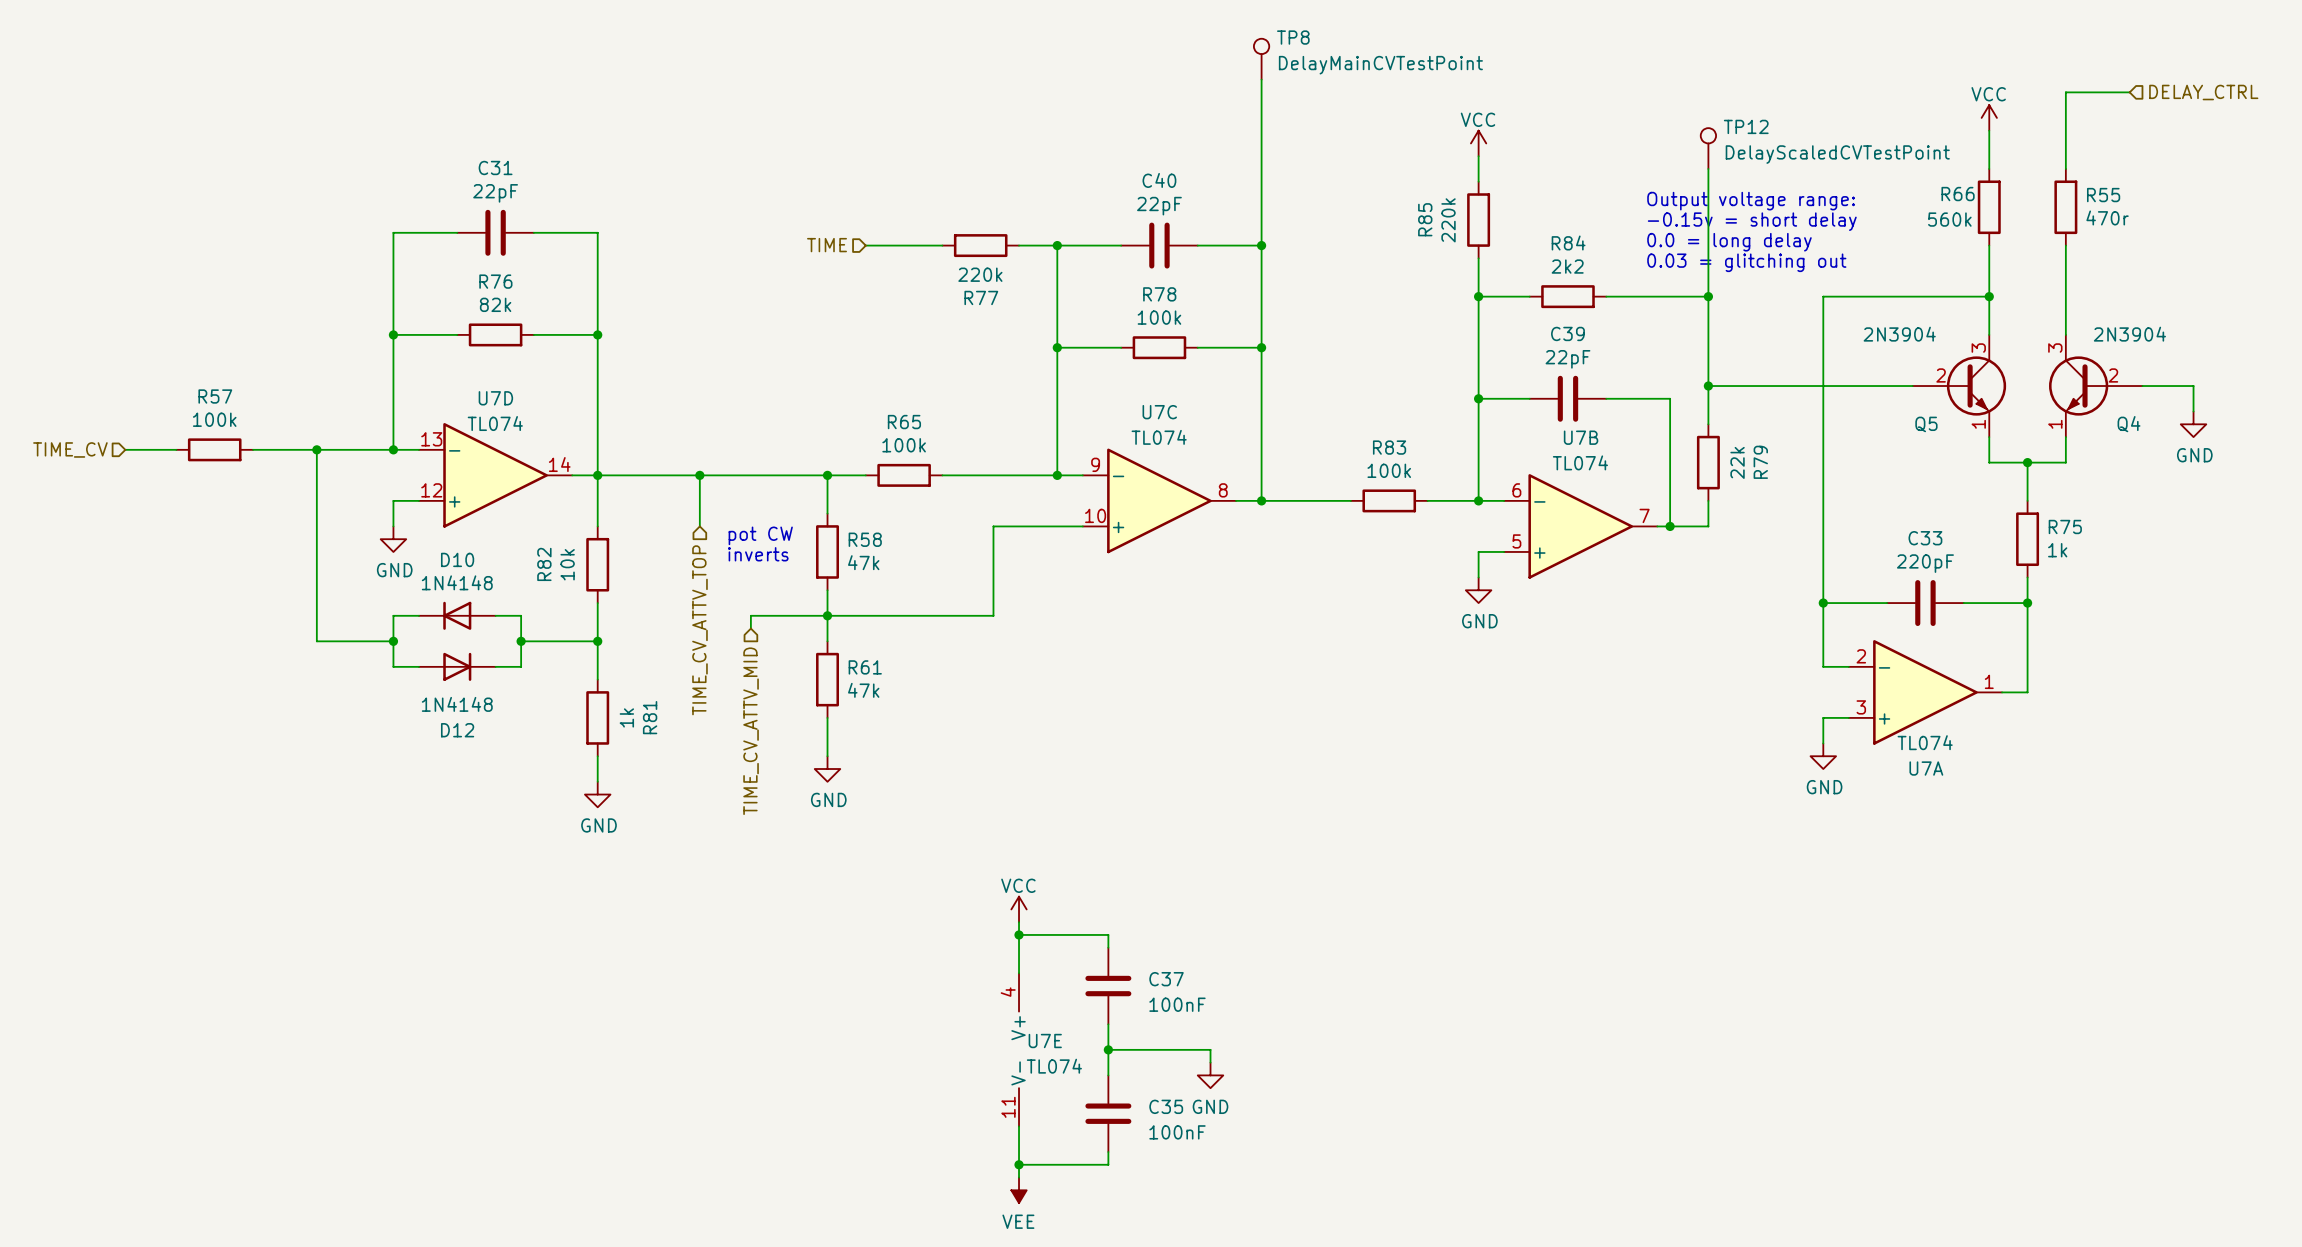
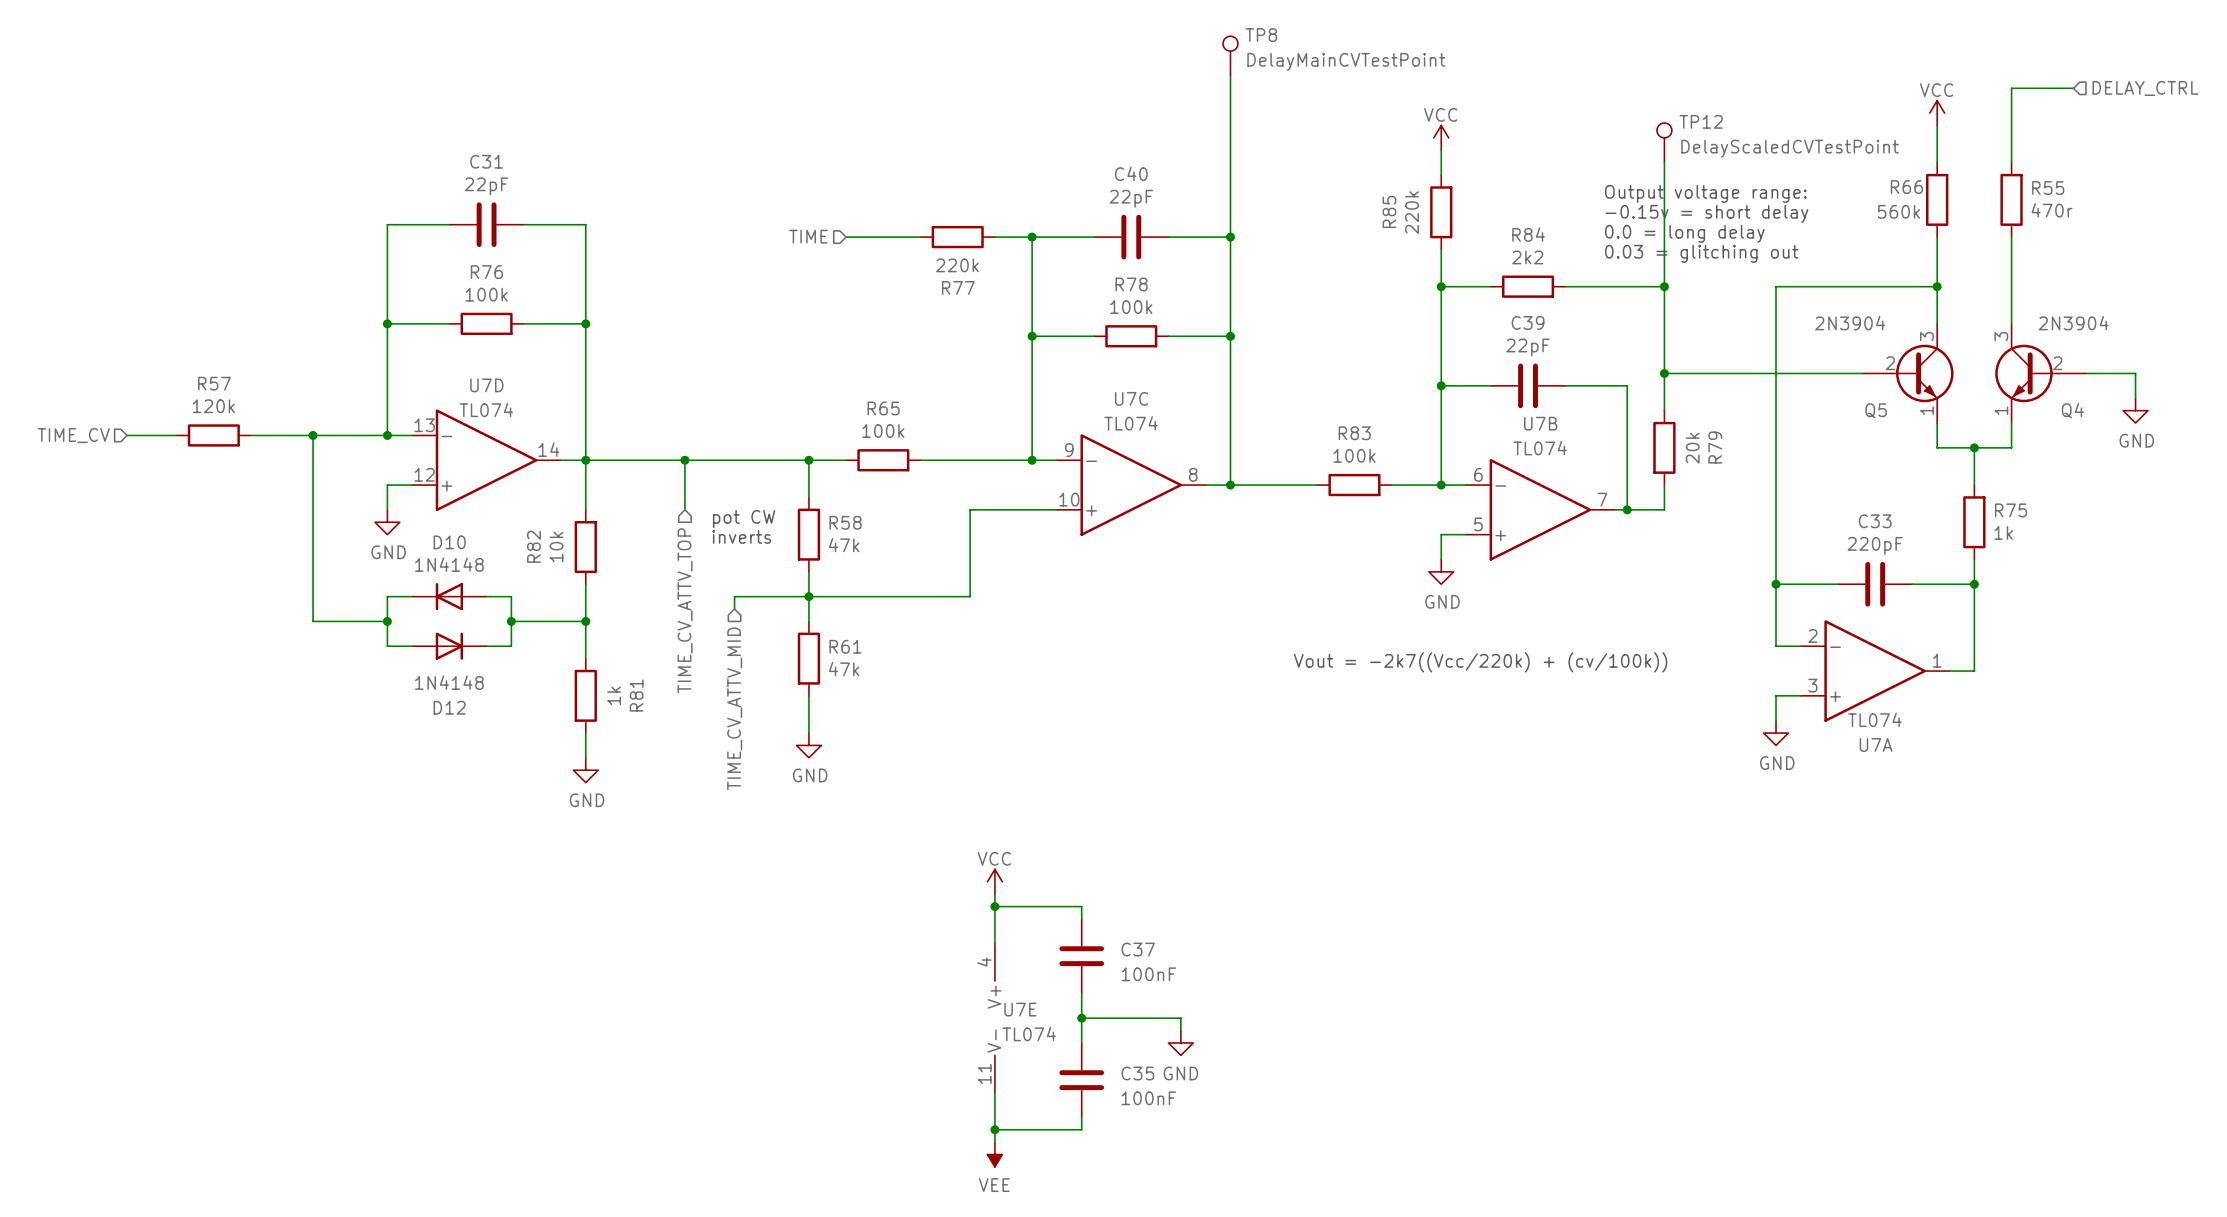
R76 value: 82k (495, 304) -> 100k (486, 294)
R57 value: 100k (214, 419) -> 120k (213, 406)
R79 value: 22k (1737, 462) -> 20k (1692, 448)
text: none -> Vout = -2k7((Vcc/220k) + (cv/100k)) (1480, 662)

